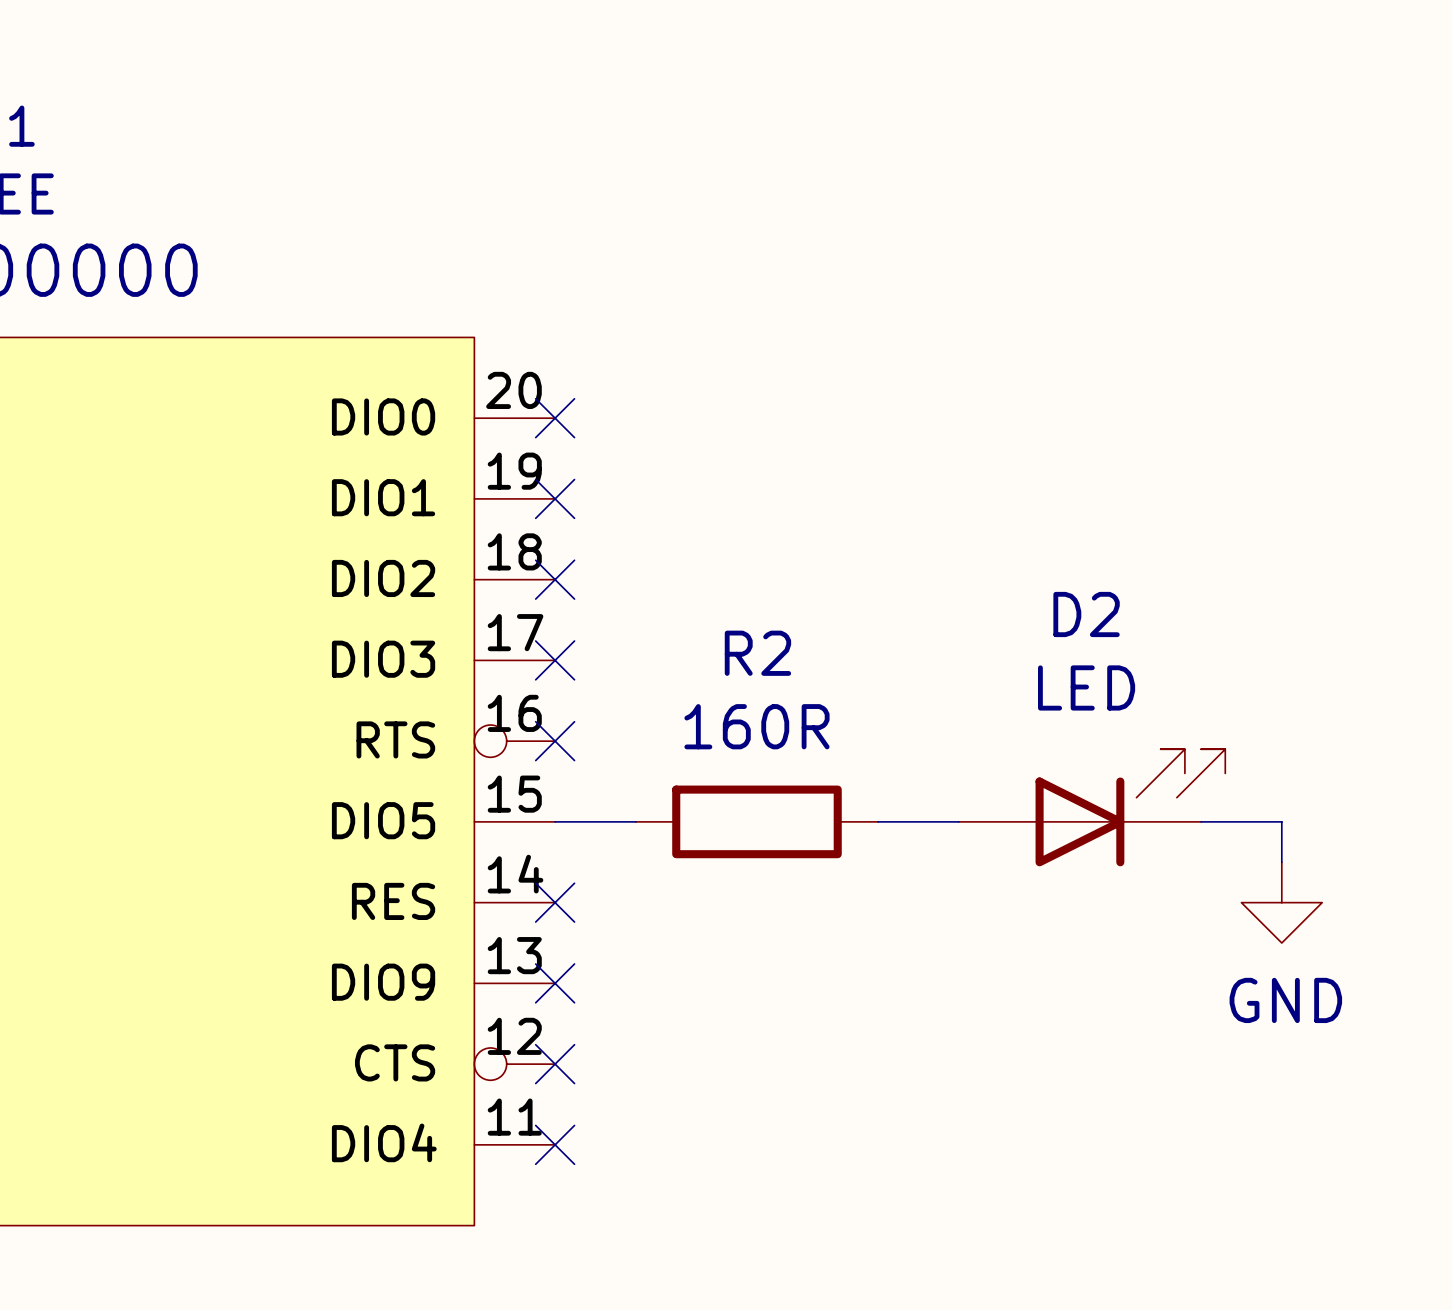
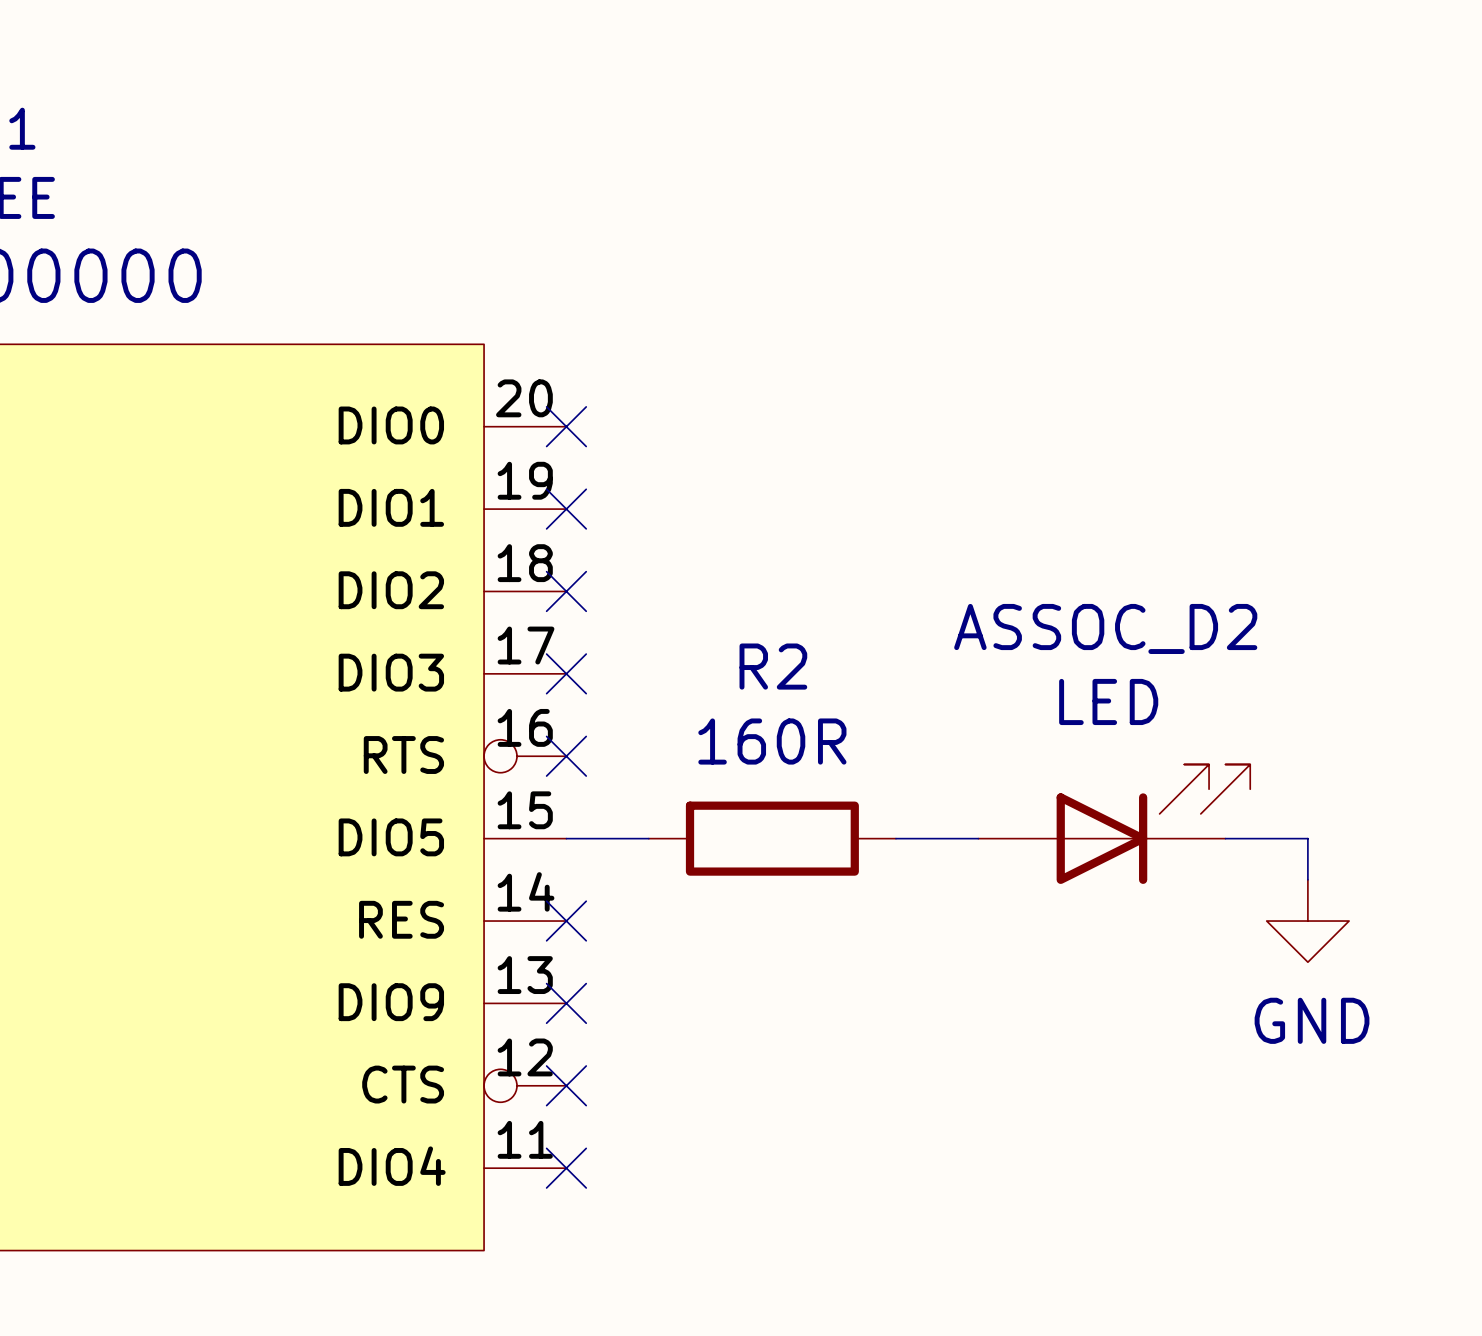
D2 name: D2 (1086, 614) -> ASSOC_D2 (1105, 628)

